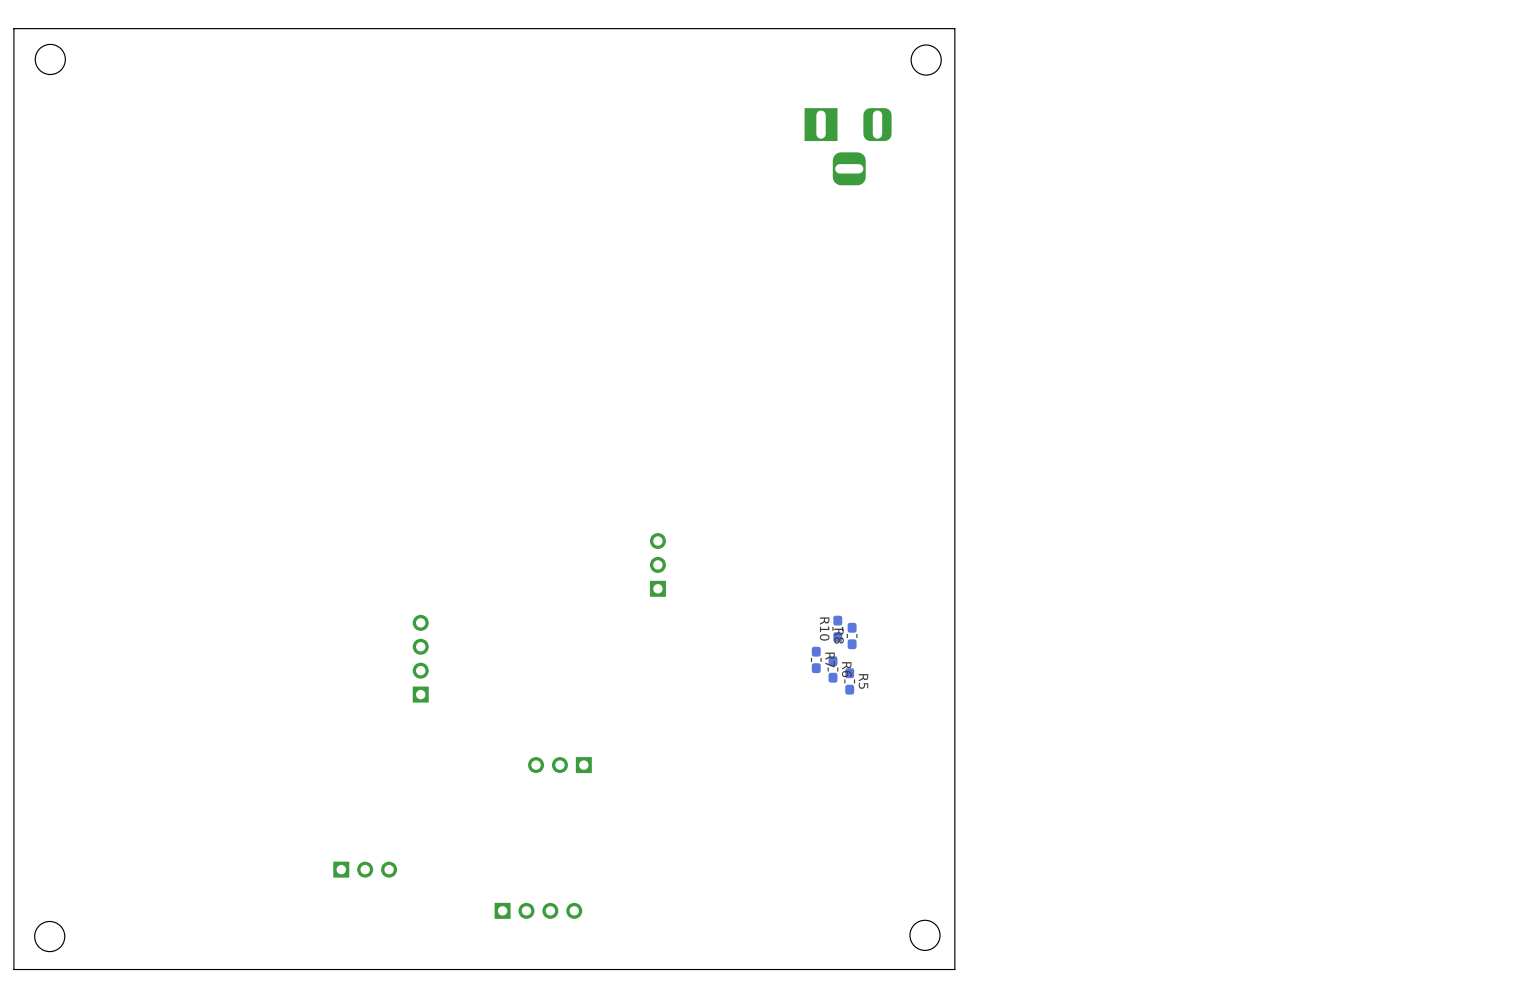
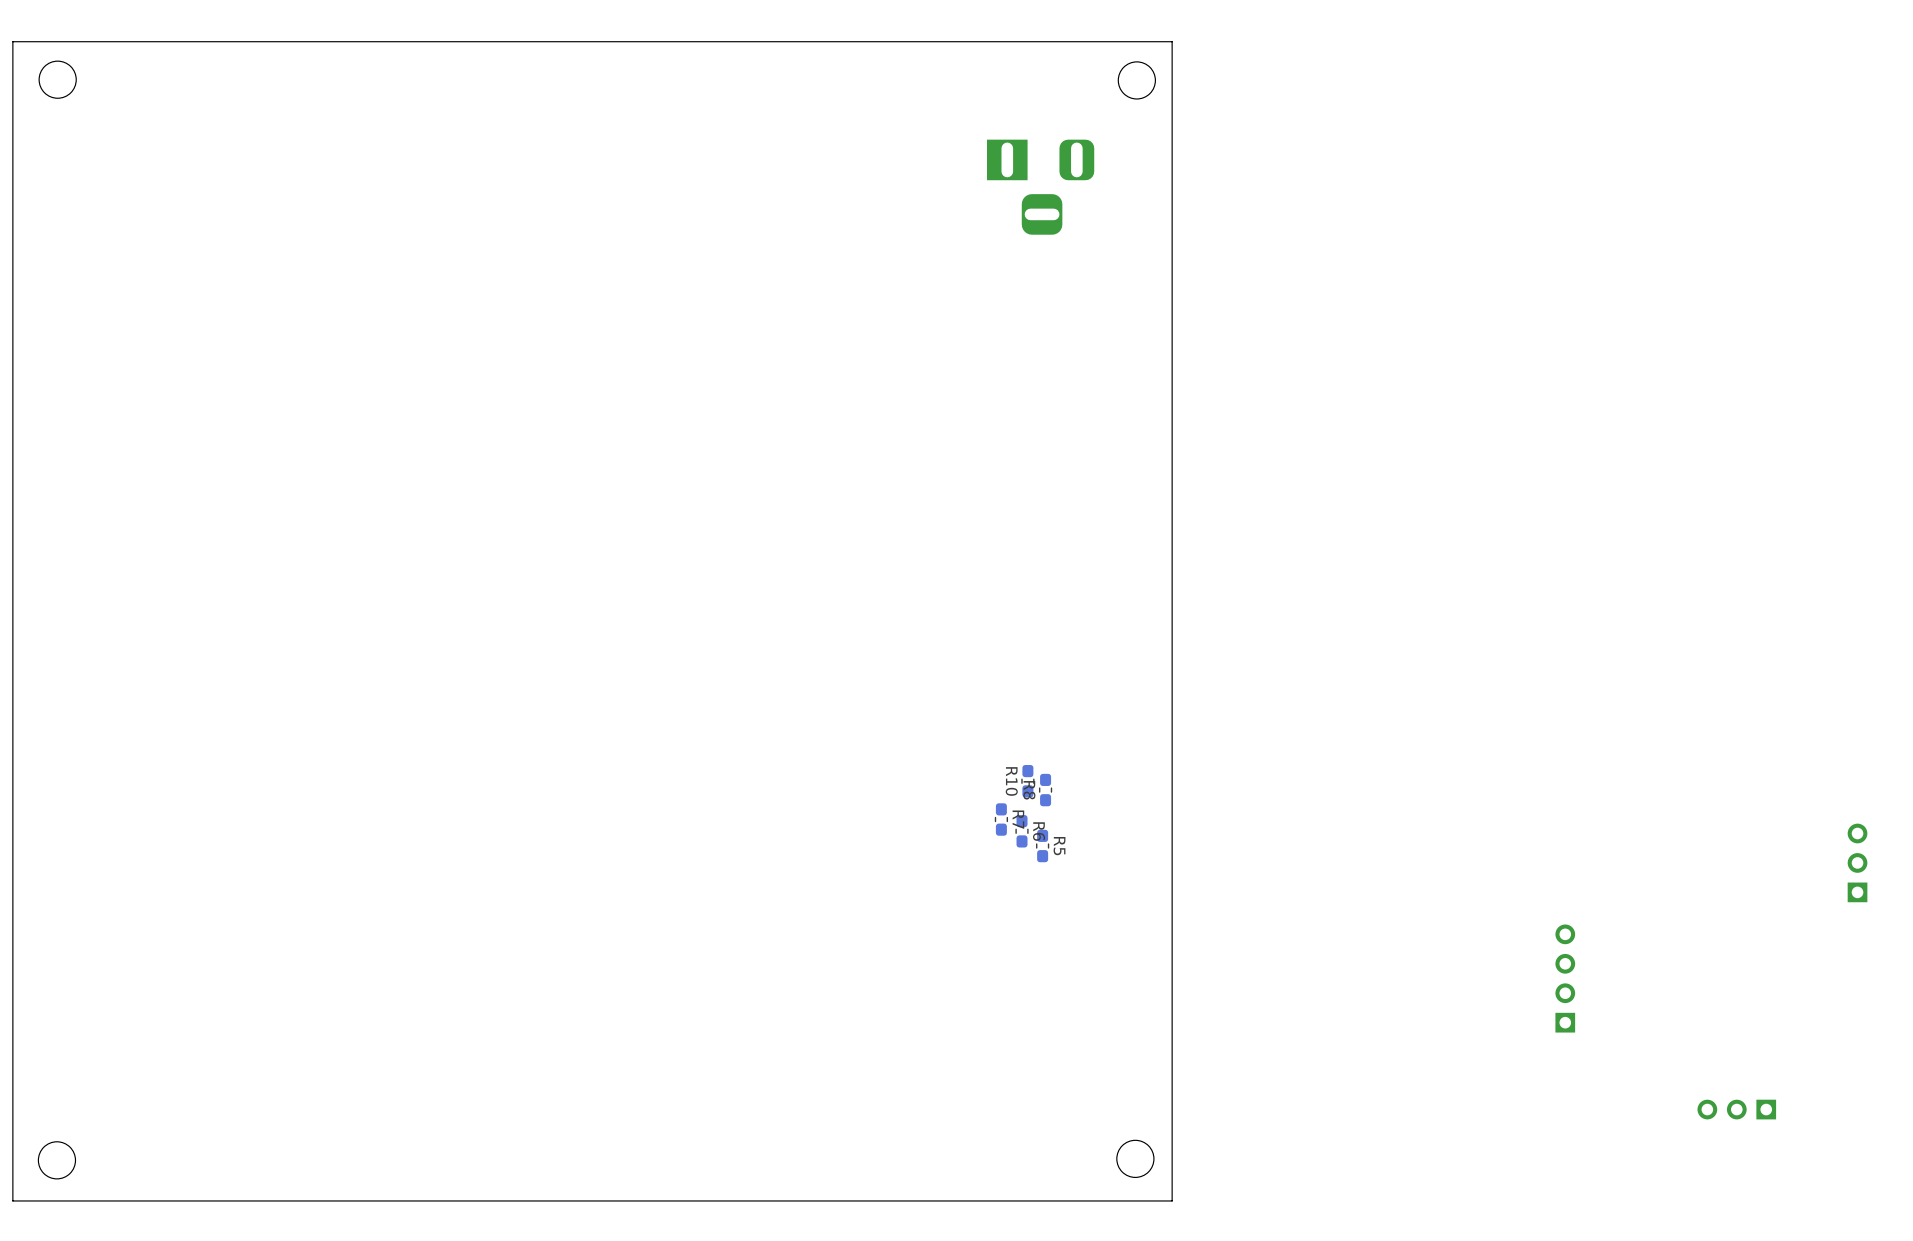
part: (657, 564) -> none
part: (420, 658) -> none
part: none -> (1857, 862)
part: (559, 765) -> none
part: none -> (1565, 978)
part: (365, 869) -> none
part: none -> (1736, 1109)
part: (538, 910) -> none

